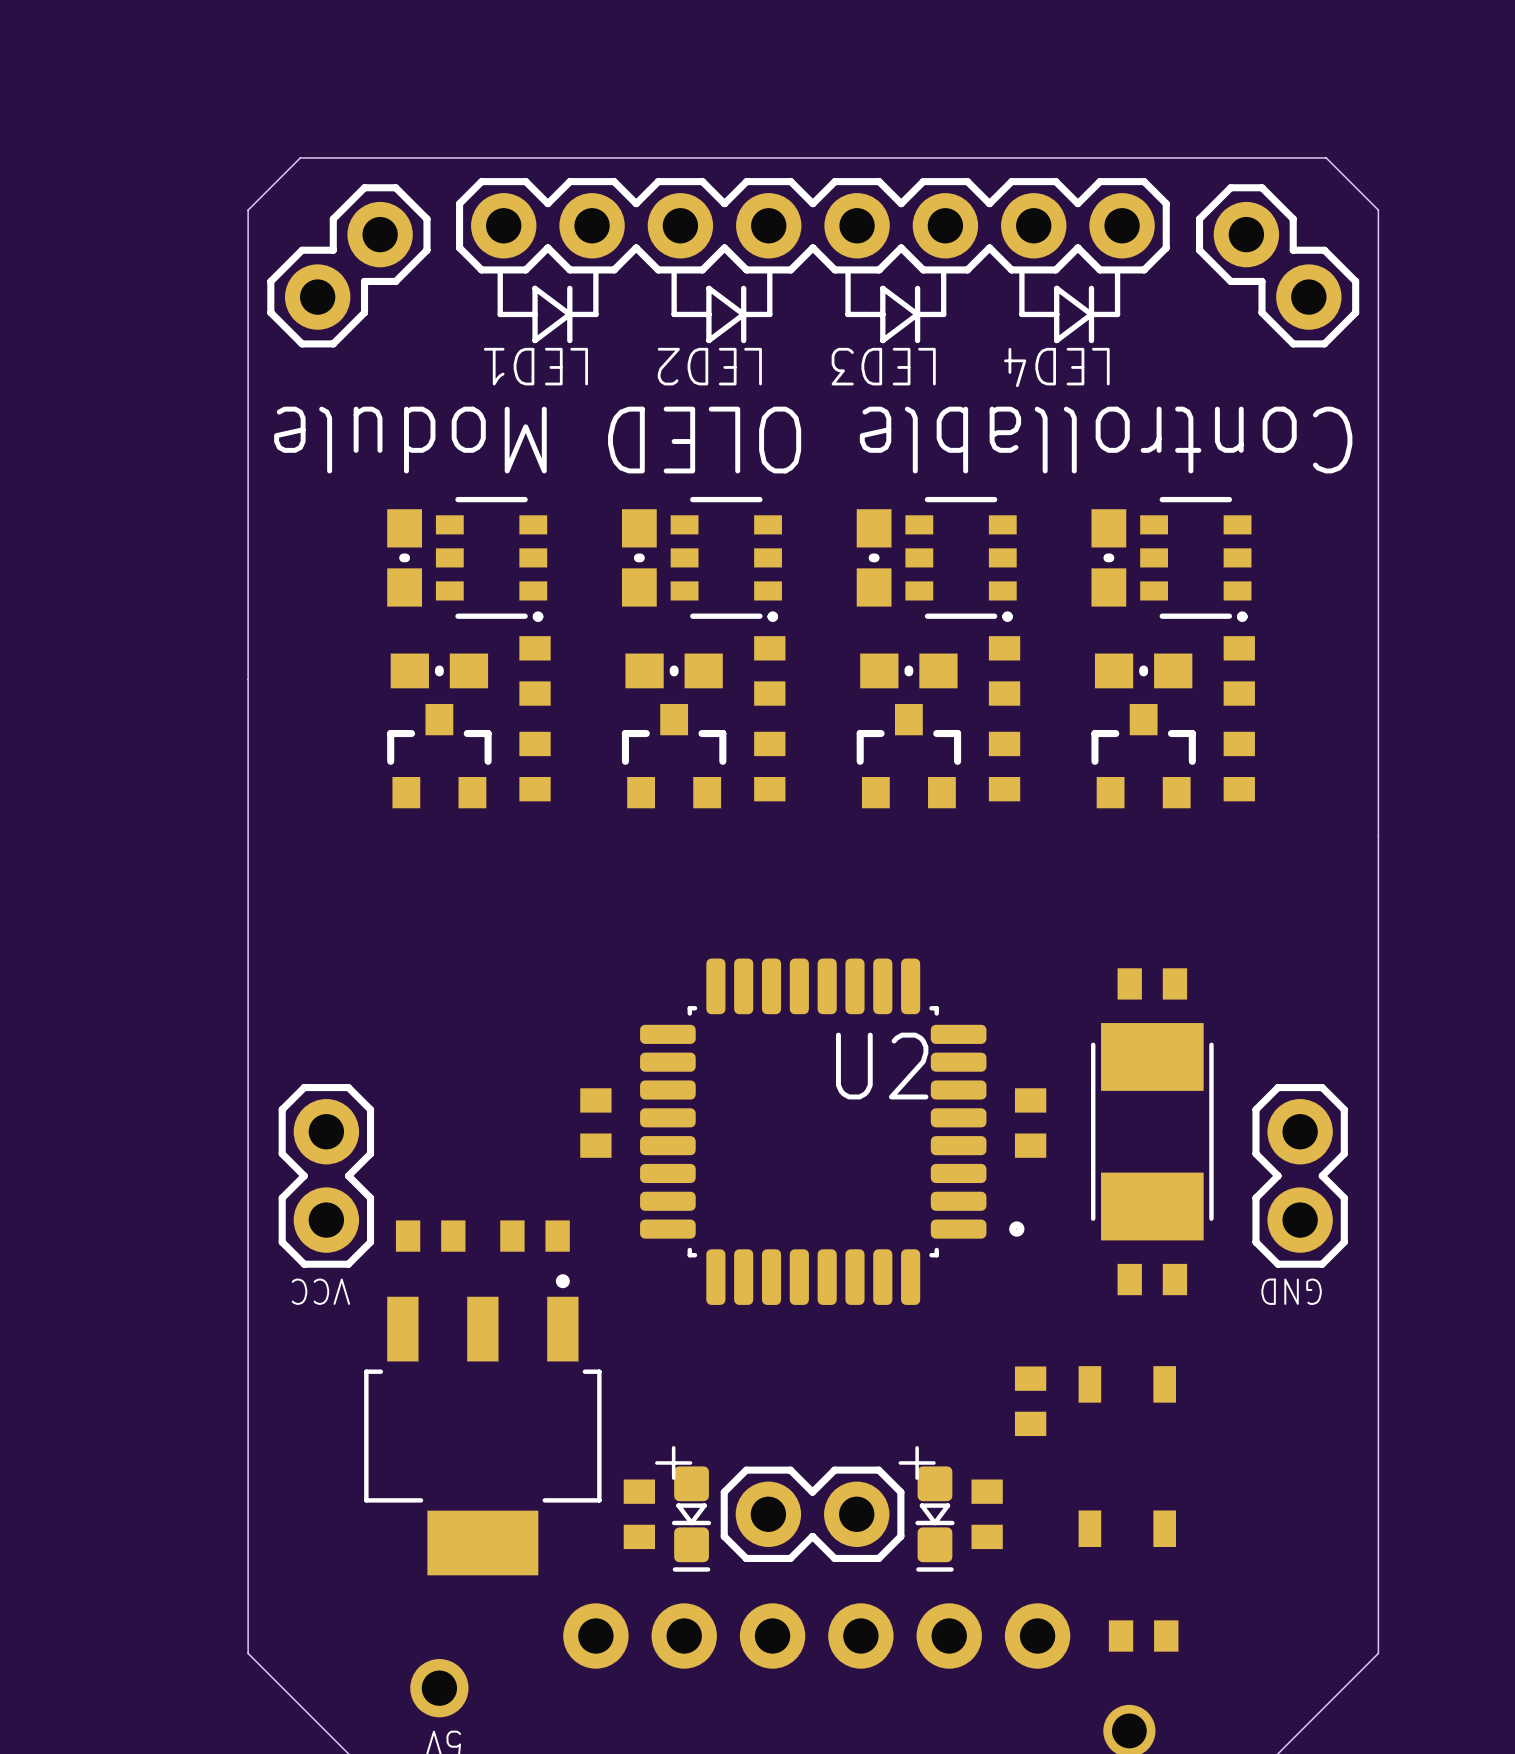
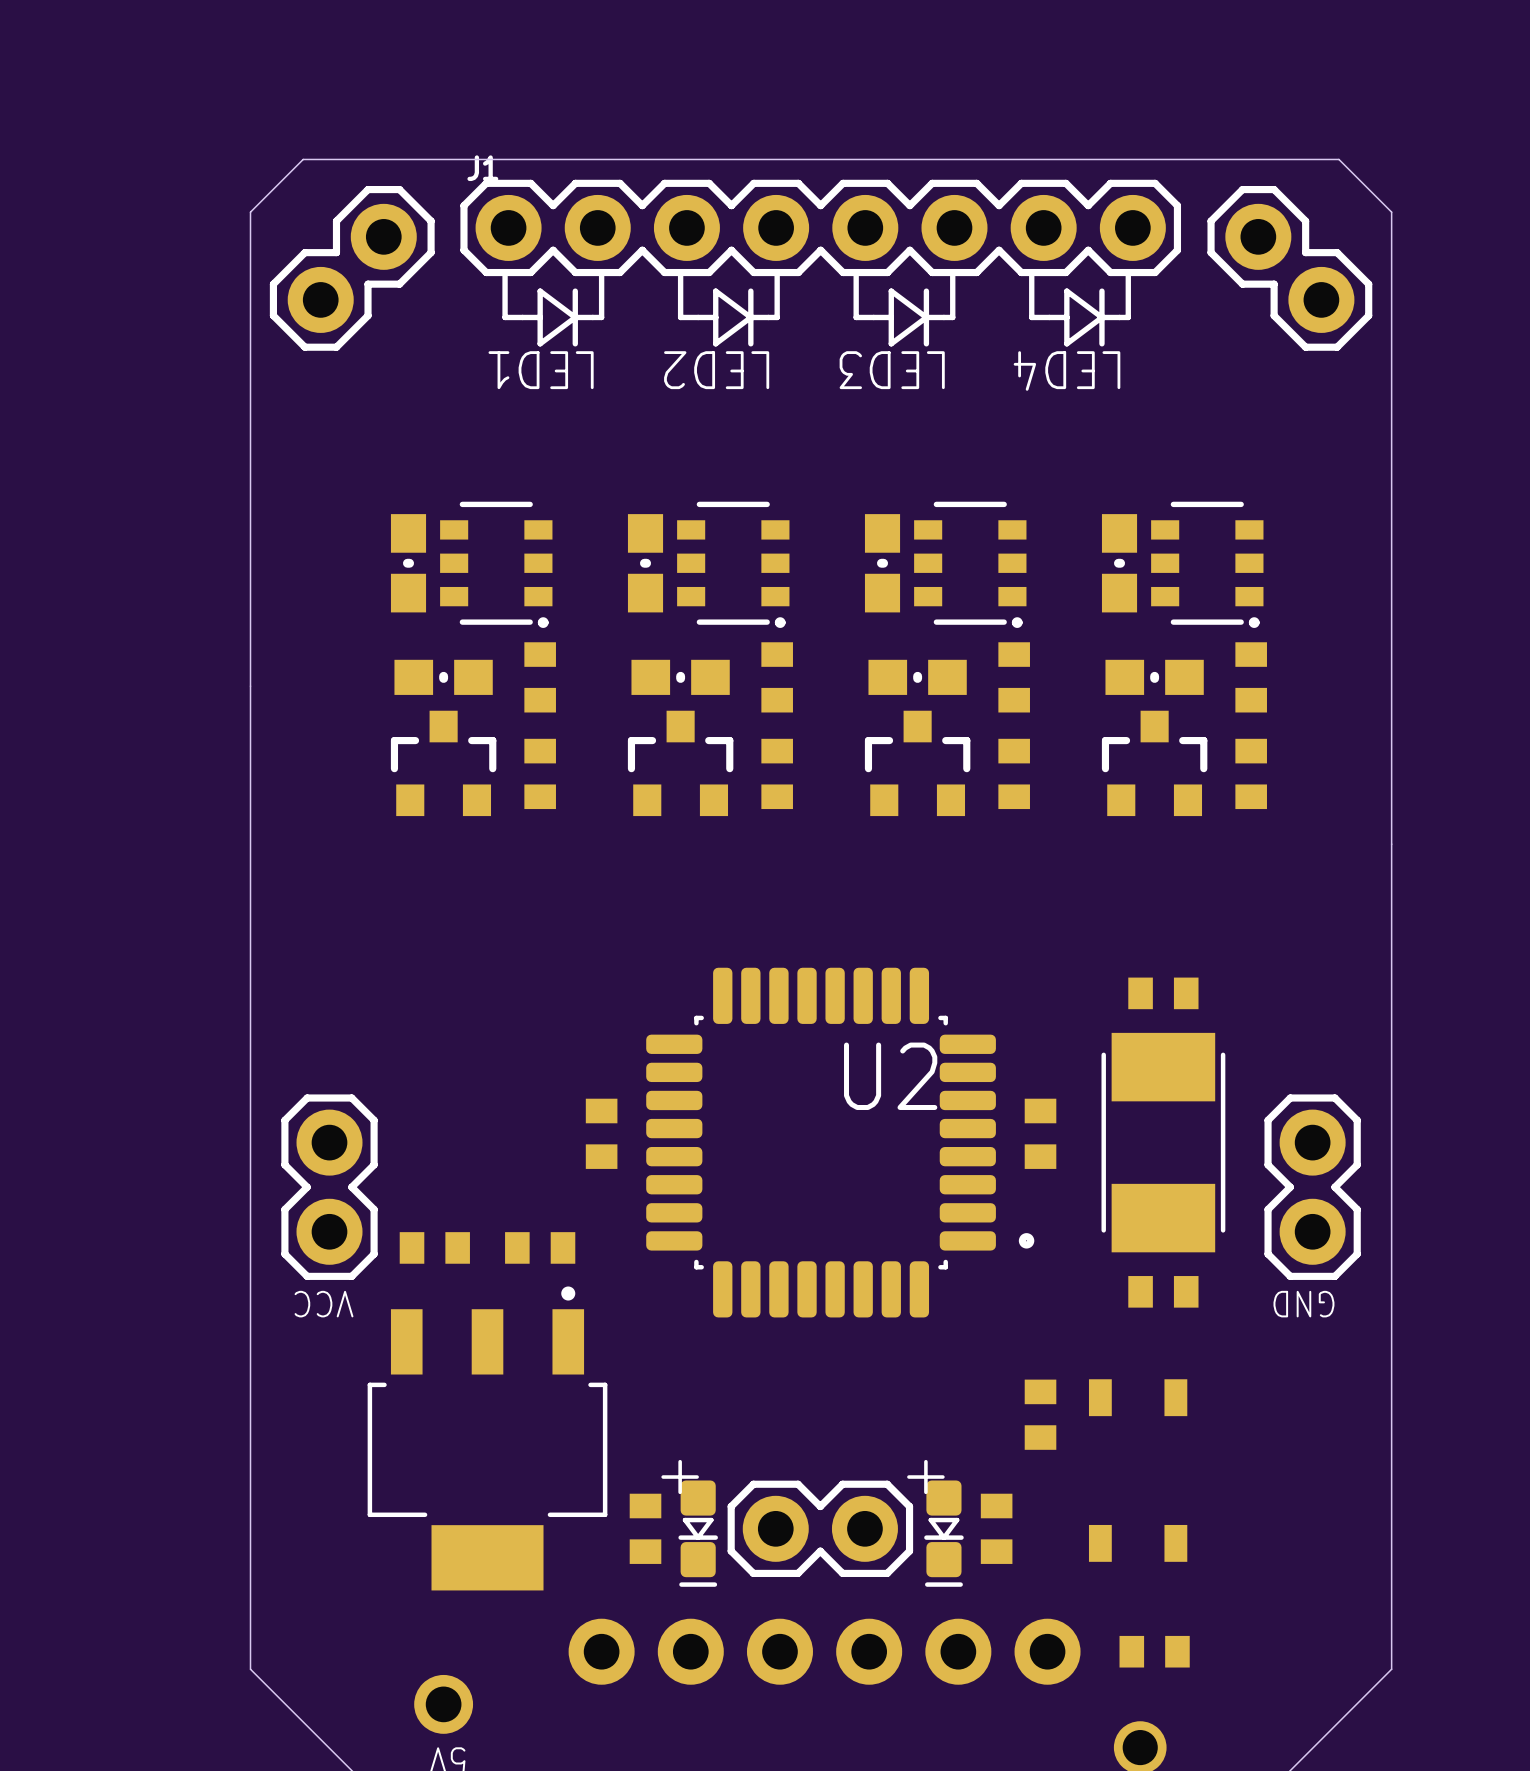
J1 name: none -> J1 (482, 168)
text: Controllable OLED Module (813, 440) -> none

